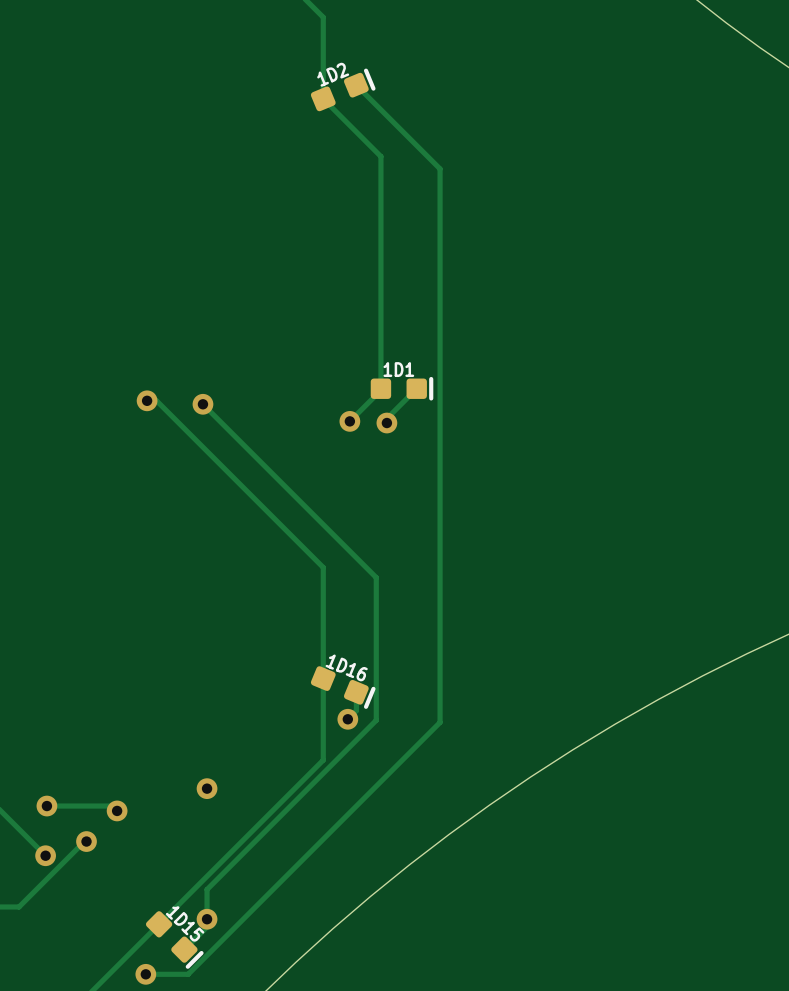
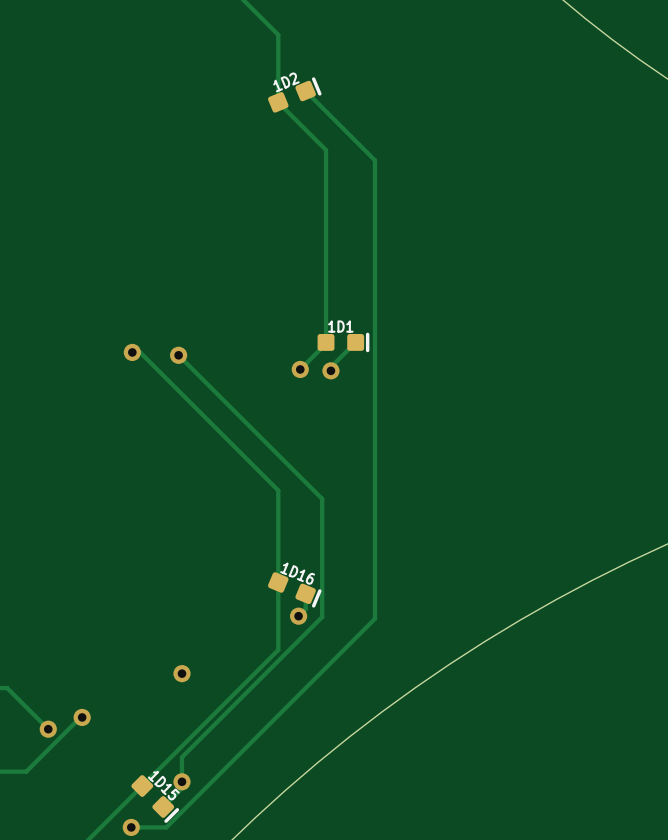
track: (46, 806) (112, 806) (117, 810) -> none
via: (46, 806) -> none
via: (117, 810) -> none

